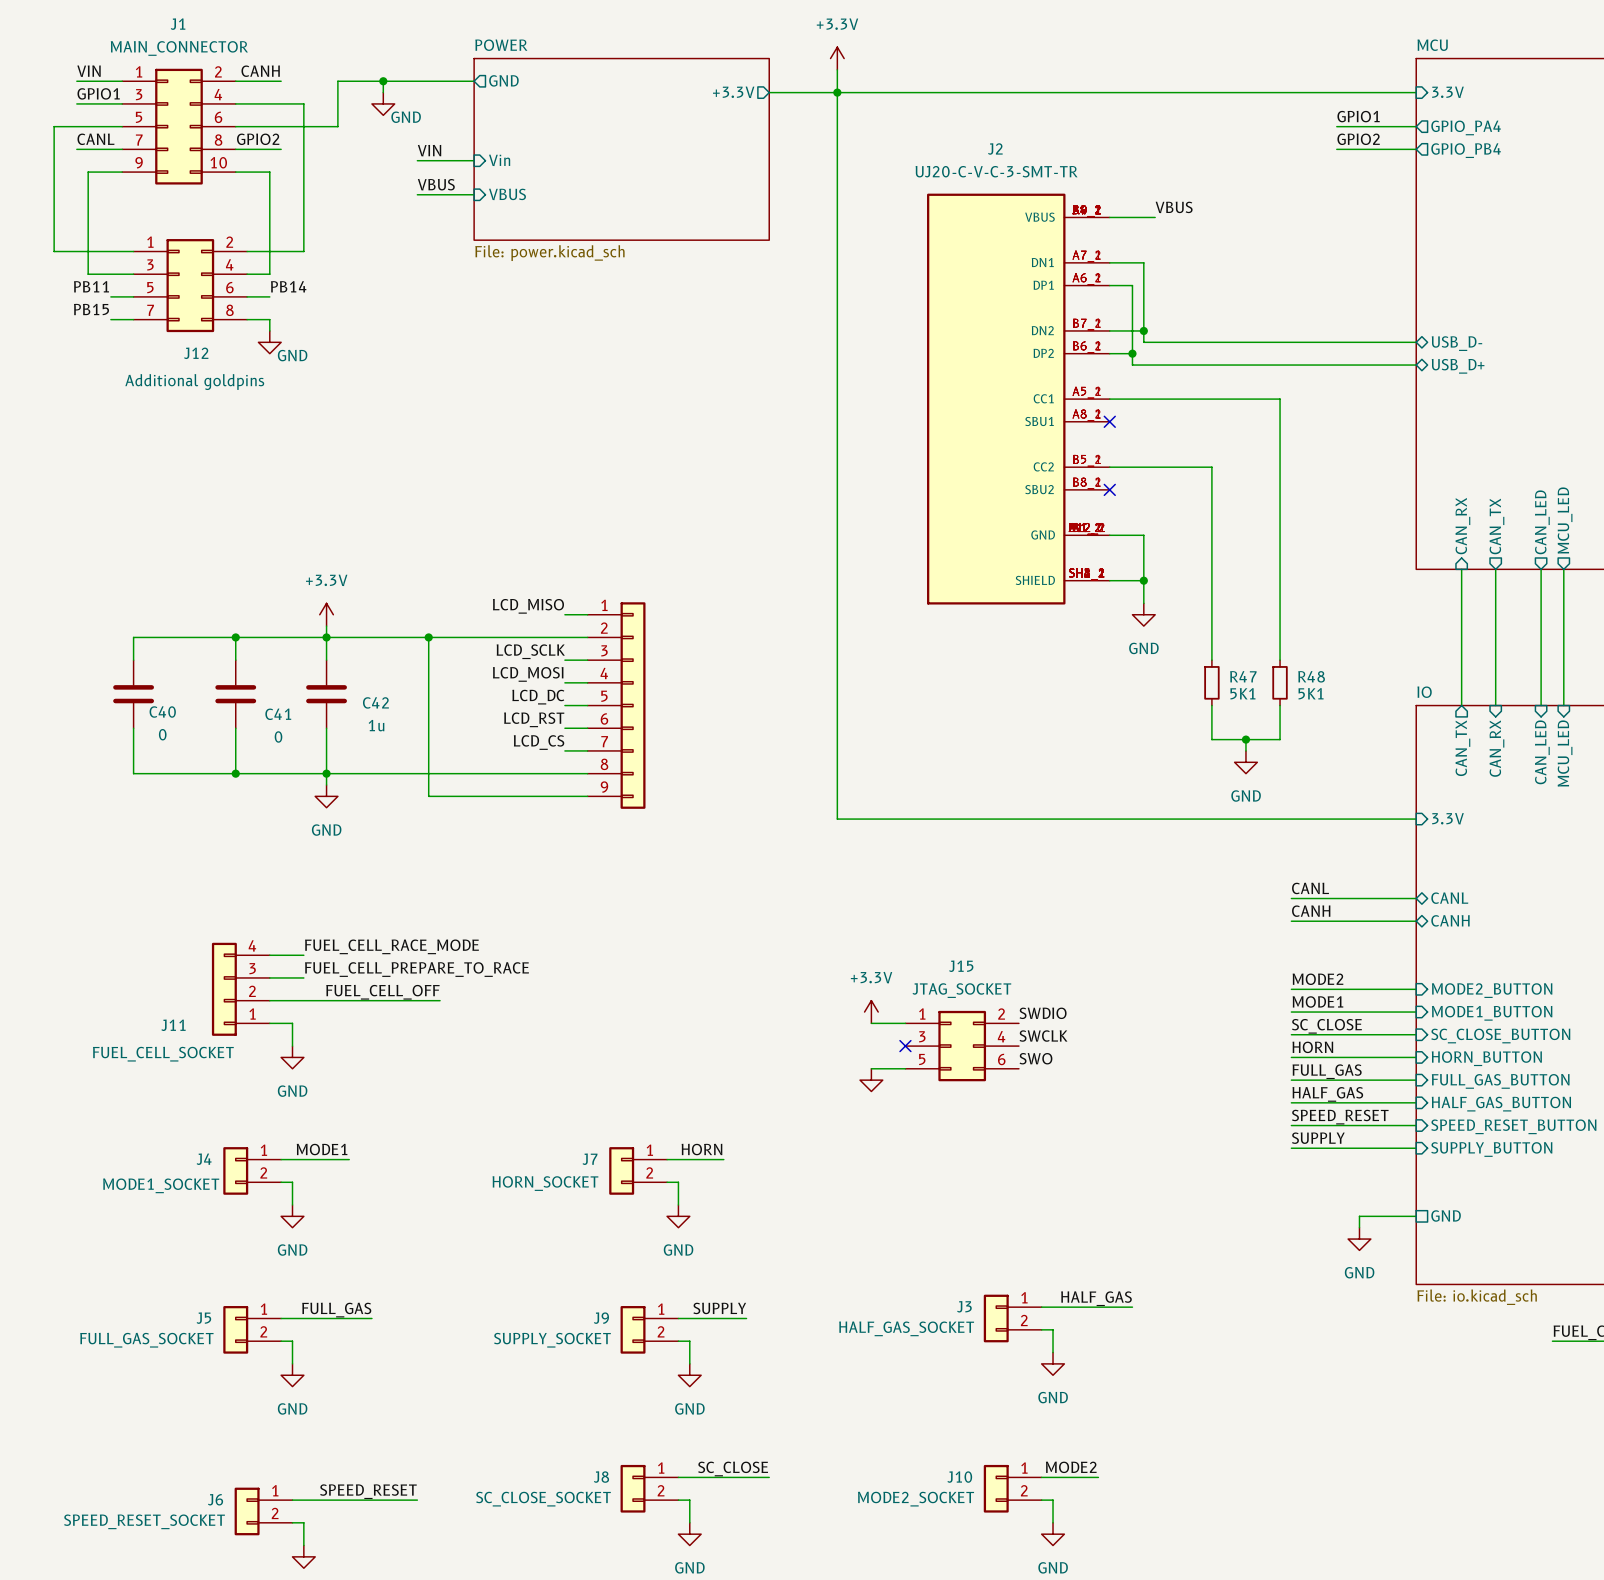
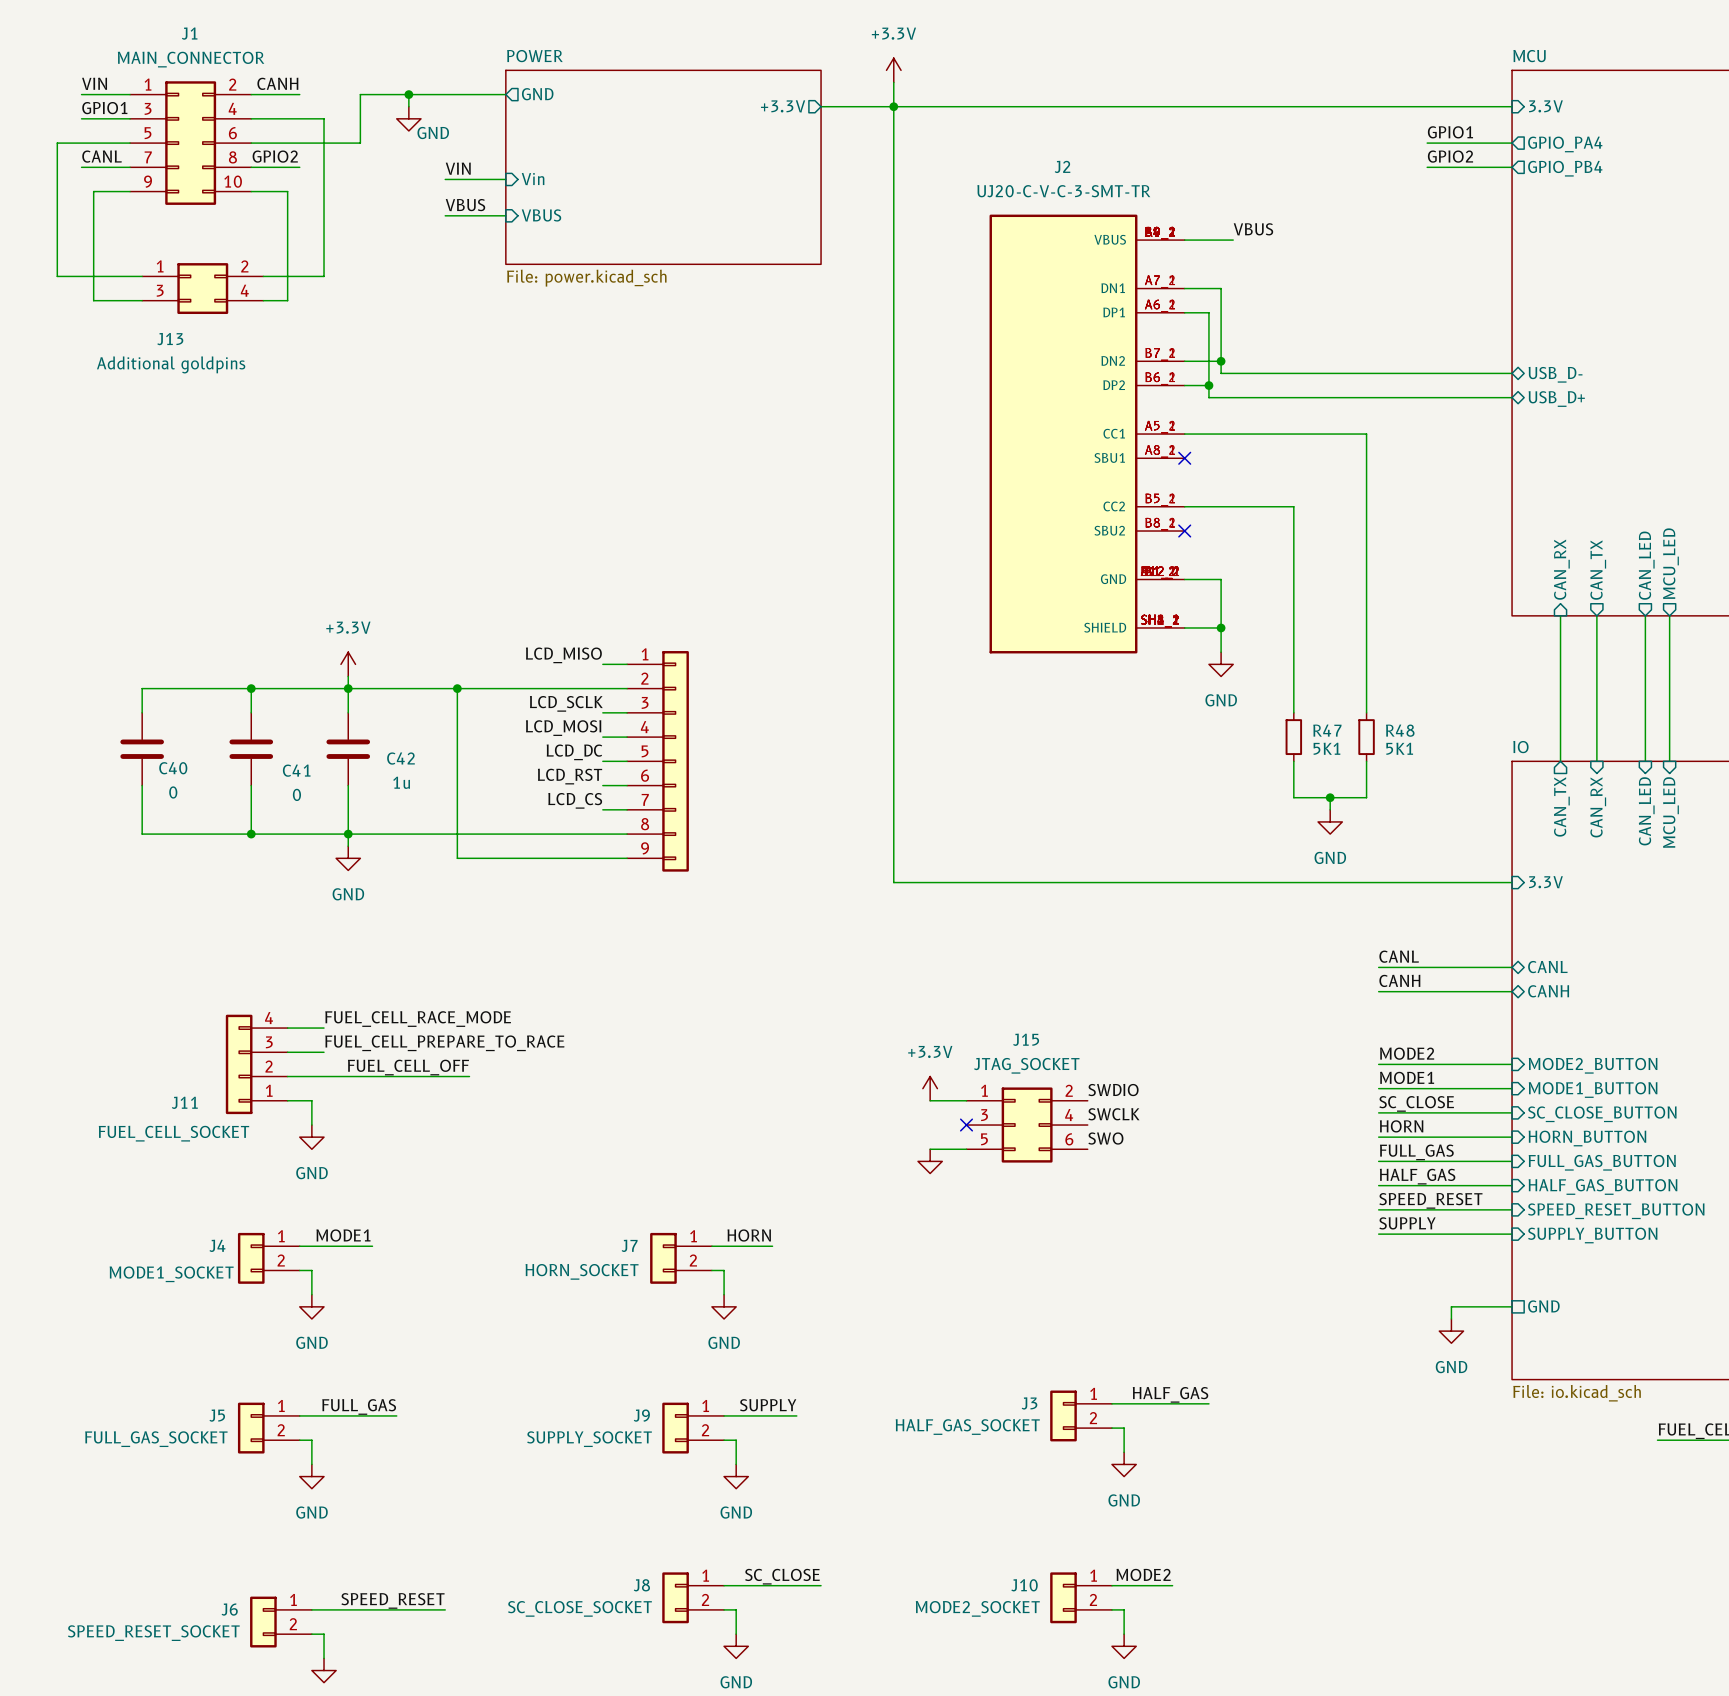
J13: none -> Additional goldpins (202, 288)
J12: Additional goldpins (190, 285) -> none
label: PB11 (91, 286) -> none
label: PB14 (288, 286) -> none
wire: (110, 296) (133, 296) -> none
wire: (247, 296) (269, 296) -> none
label: PB15 (91, 309) -> none
wire: (110, 319) (133, 319) -> none
wire: (247, 319) (269, 319) (269, 330) -> none
power symbol: GND (269, 342) -> none

